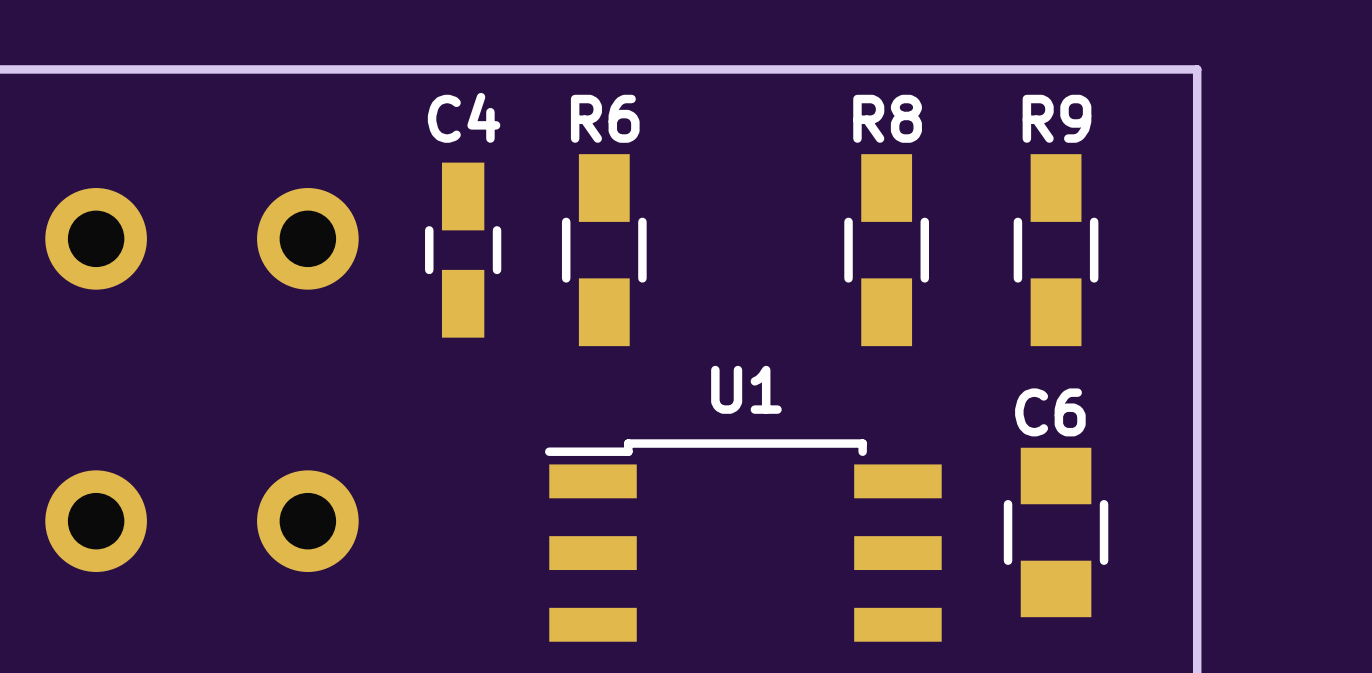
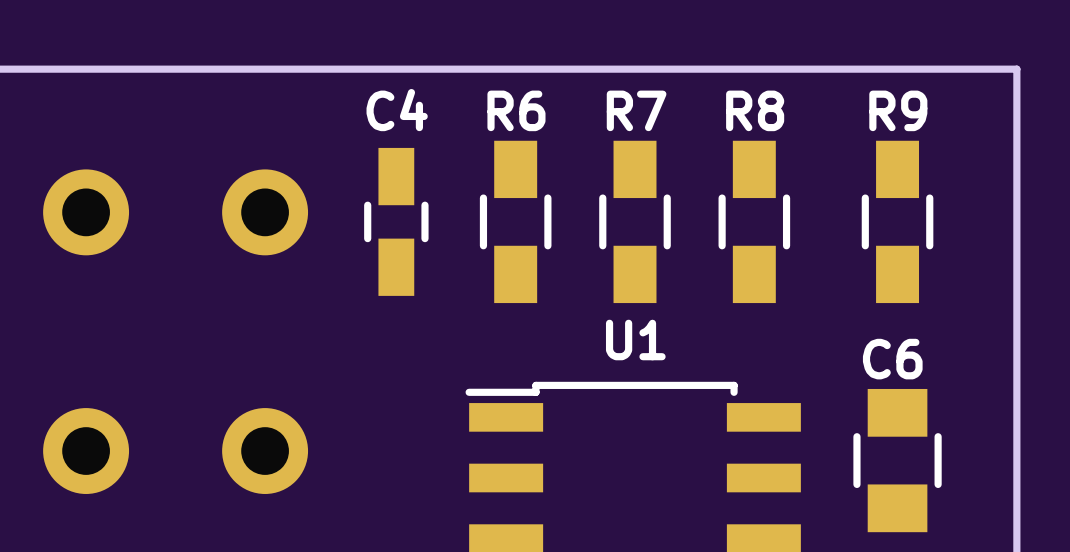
R7: none -> (635, 221)

